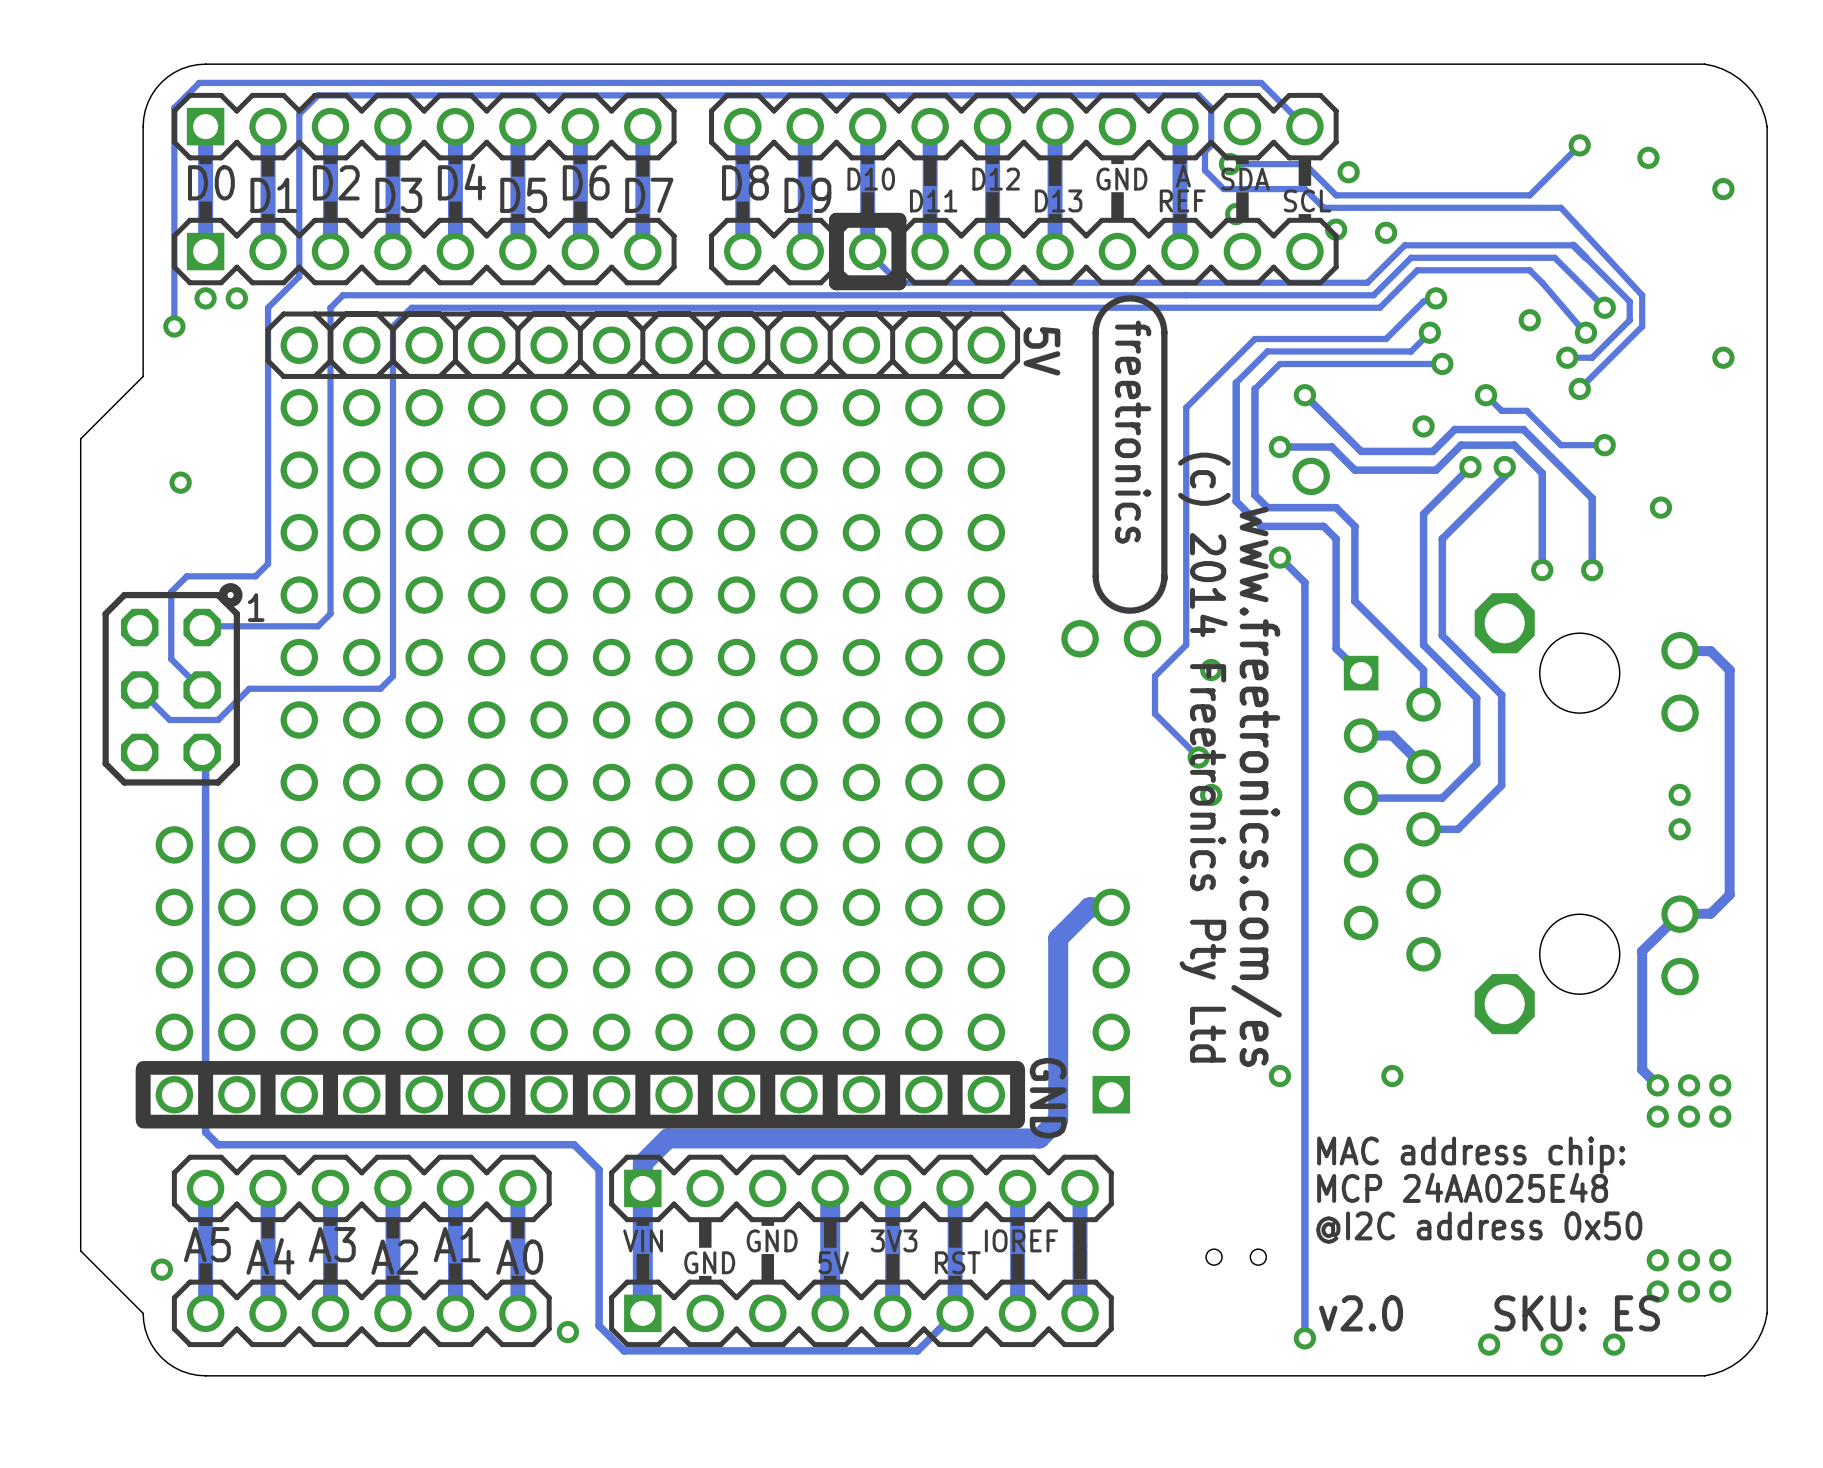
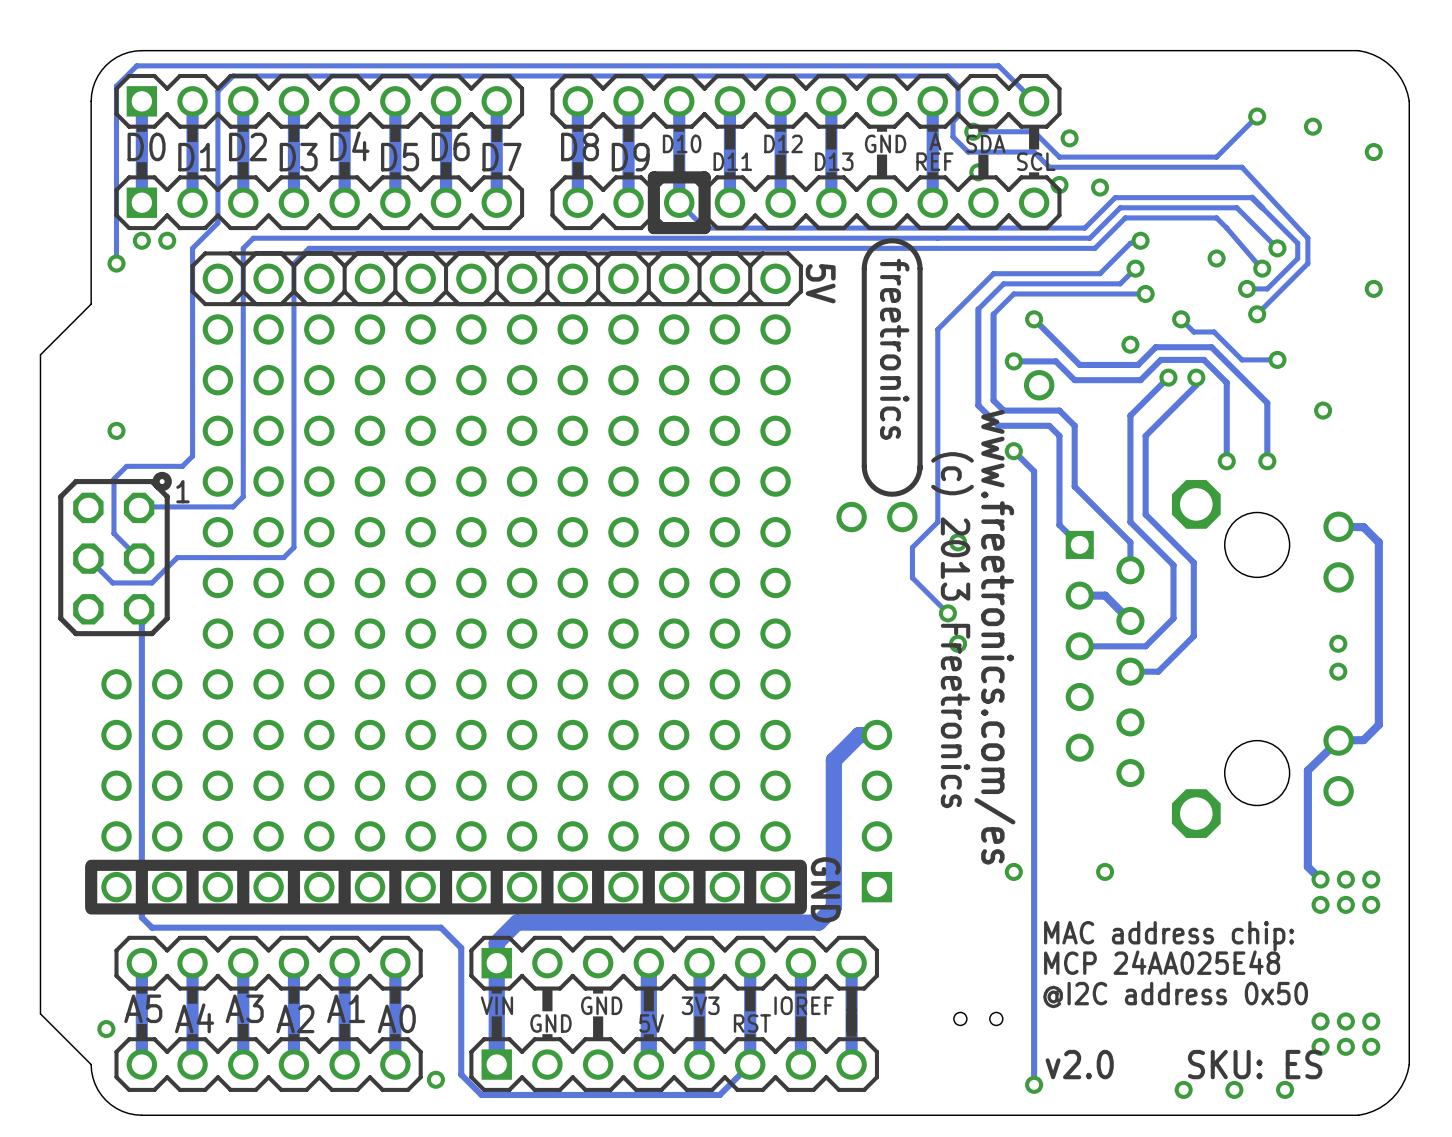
via position: (180, 482) -> (116, 430)
text: (c) 2014 Freetronics Pty Ltd (1204, 757) -> (c) 2013 Freetronics (952, 630)

